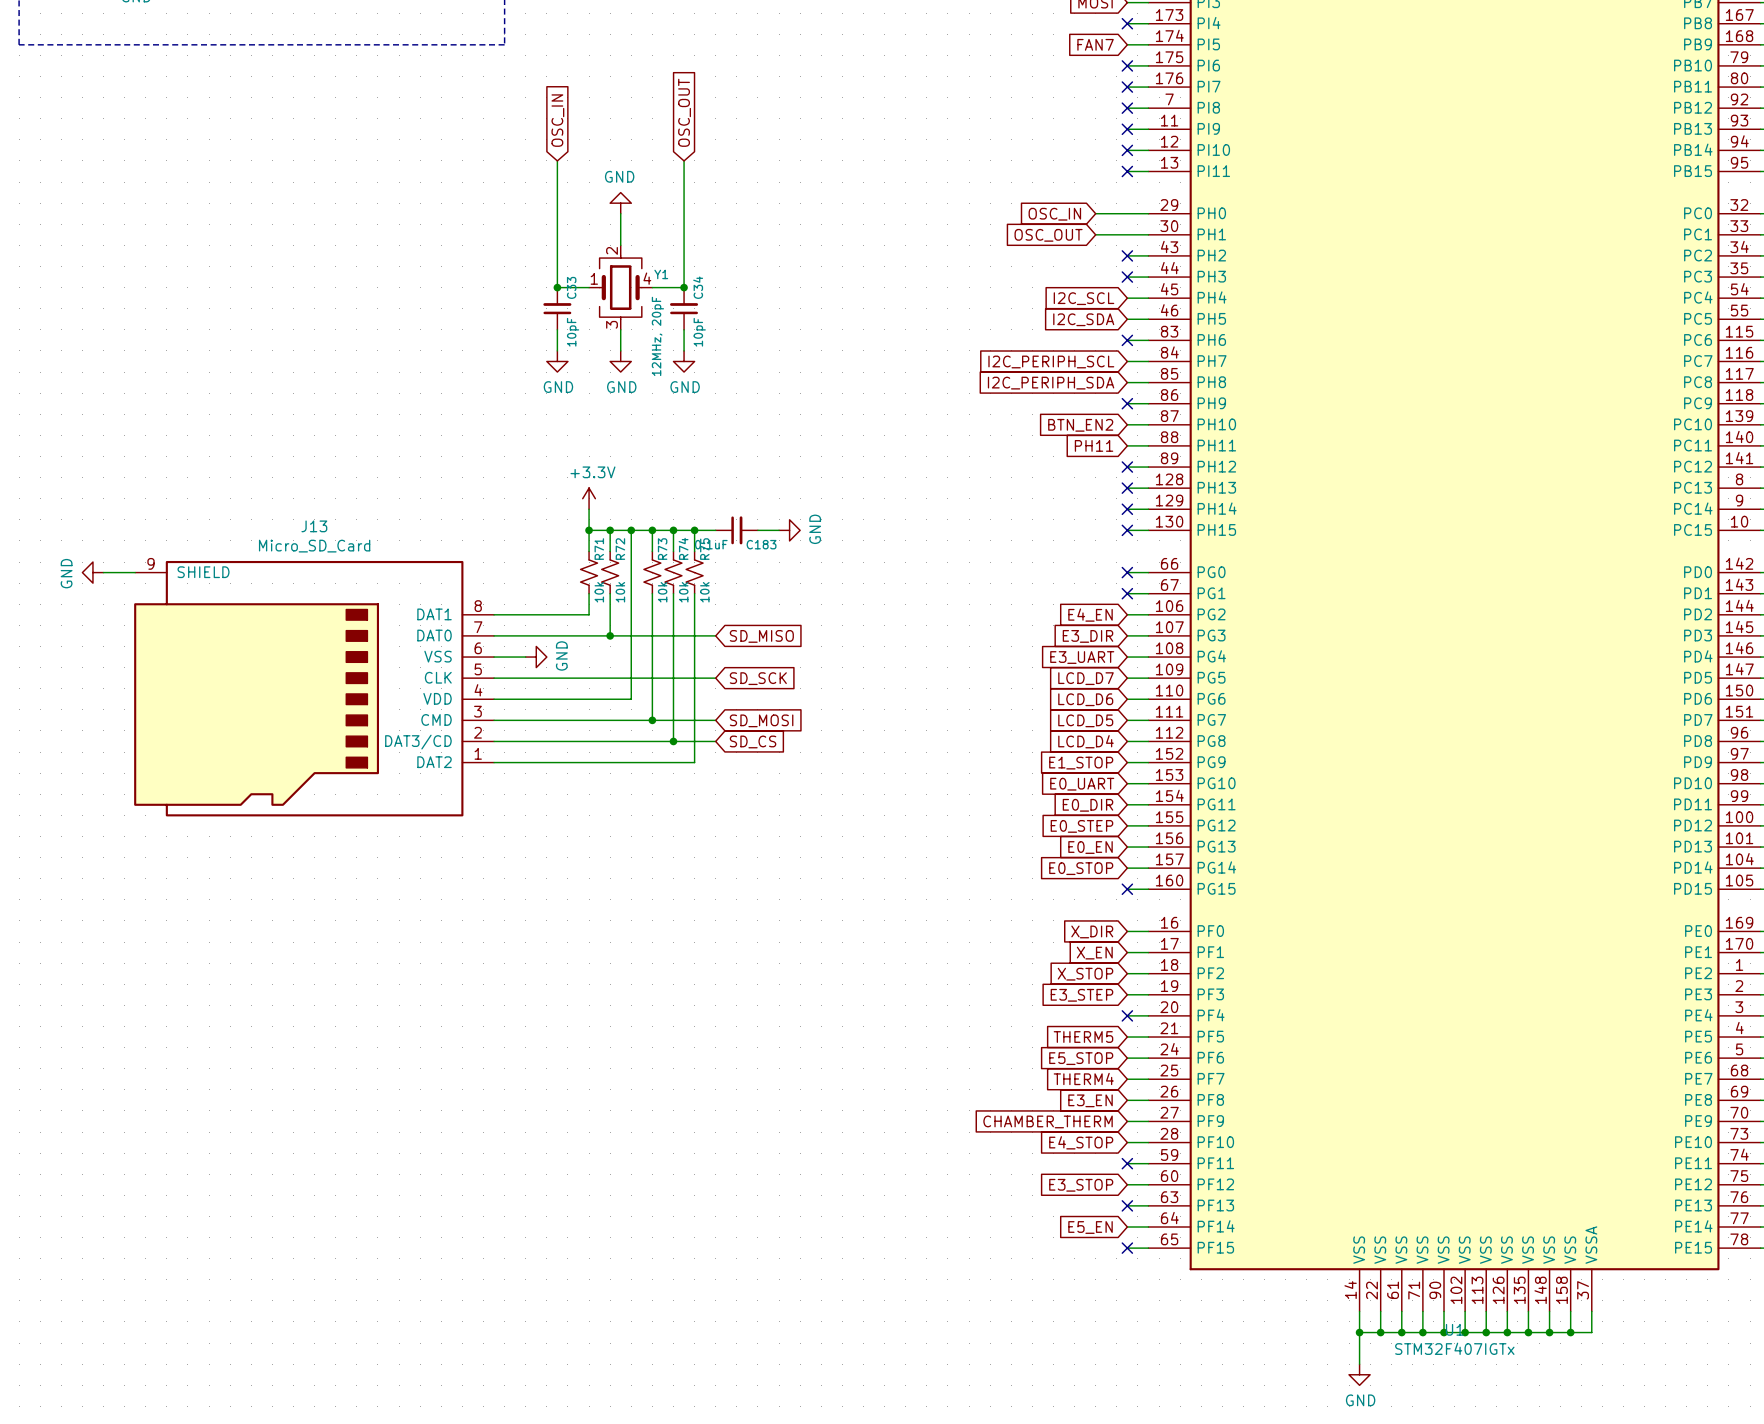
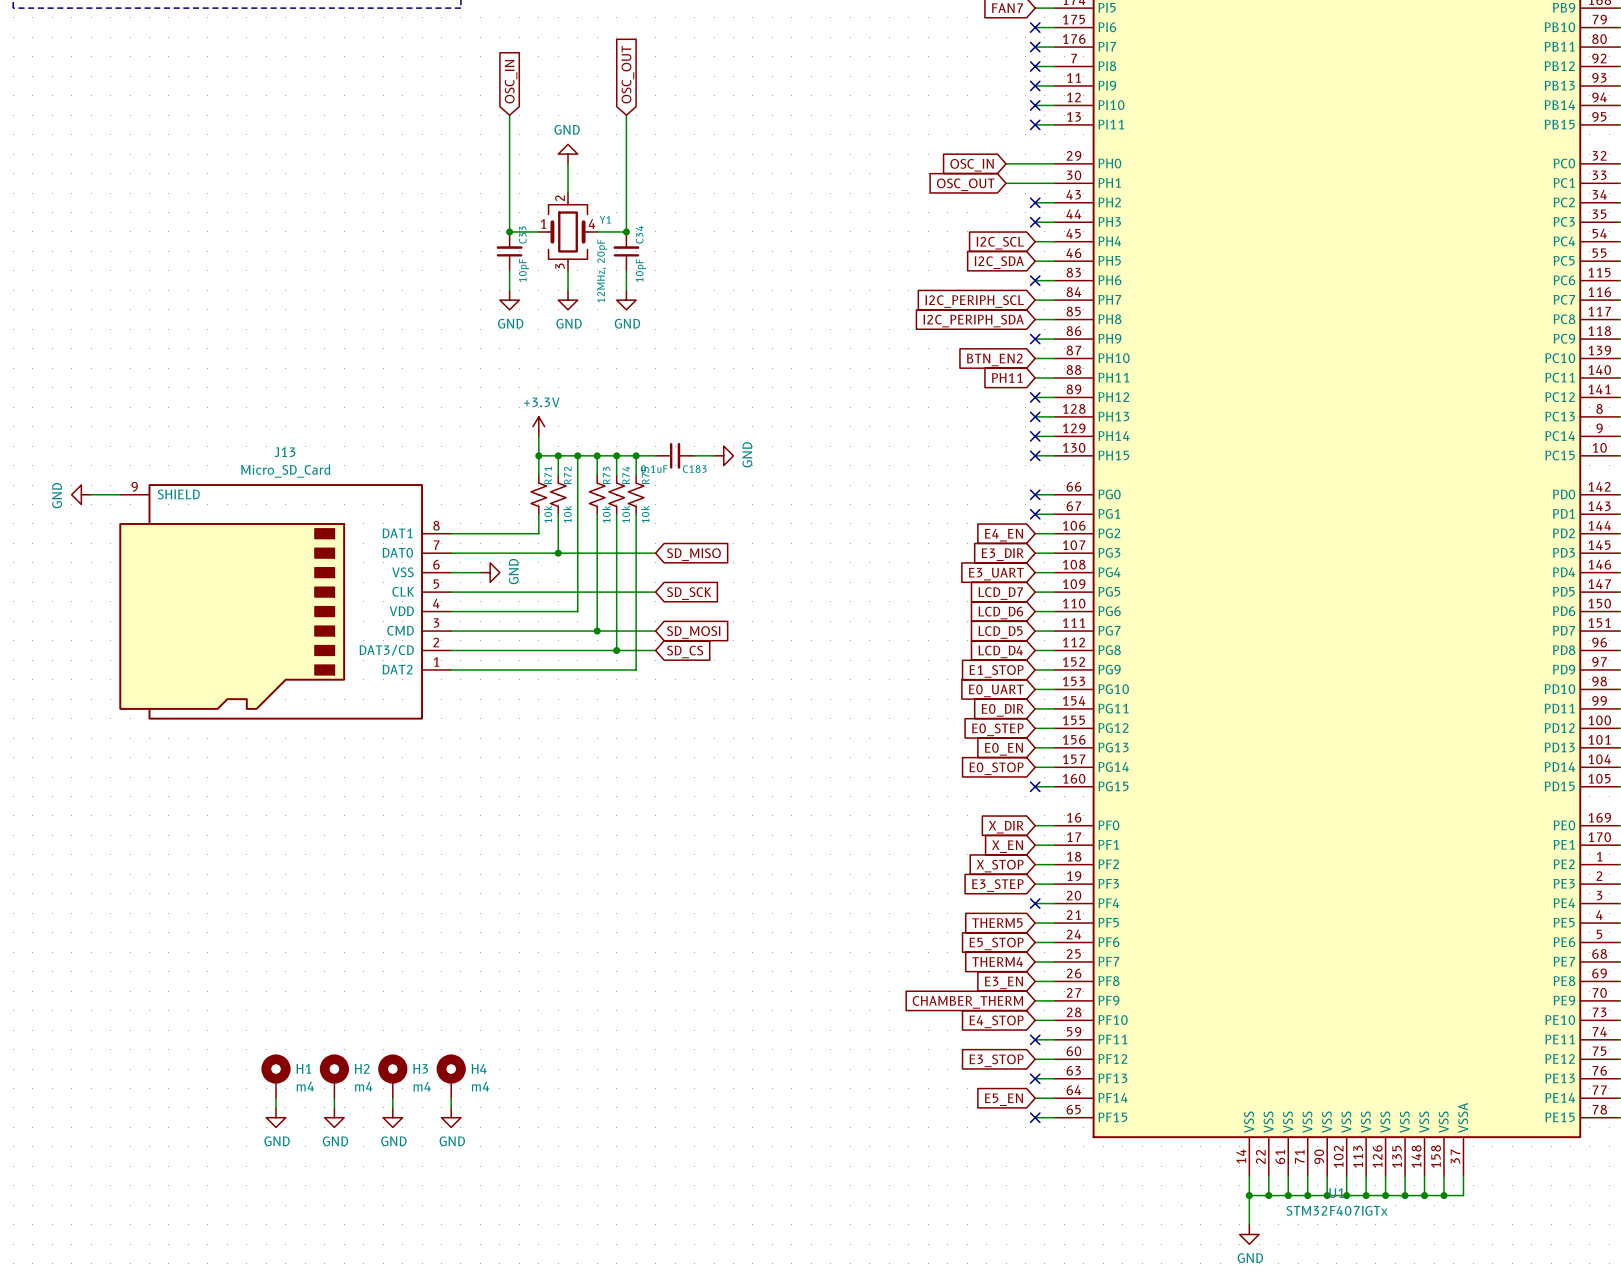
H1: none -> m4 (276, 1076)
H2: none -> m4 (334, 1076)
H3: none -> m4 (392, 1076)
H4: none -> m4 (451, 1076)
wire: none -> (276, 1098) (276, 1107)
wire: none -> (334, 1098) (334, 1107)
wire: none -> (392, 1098) (392, 1107)
wire: none -> (451, 1098) (451, 1107)
power symbol: none -> GND (276, 1117)
power symbol: none -> GND (334, 1117)
power symbol: none -> GND (392, 1117)
power symbol: none -> GND (451, 1117)

